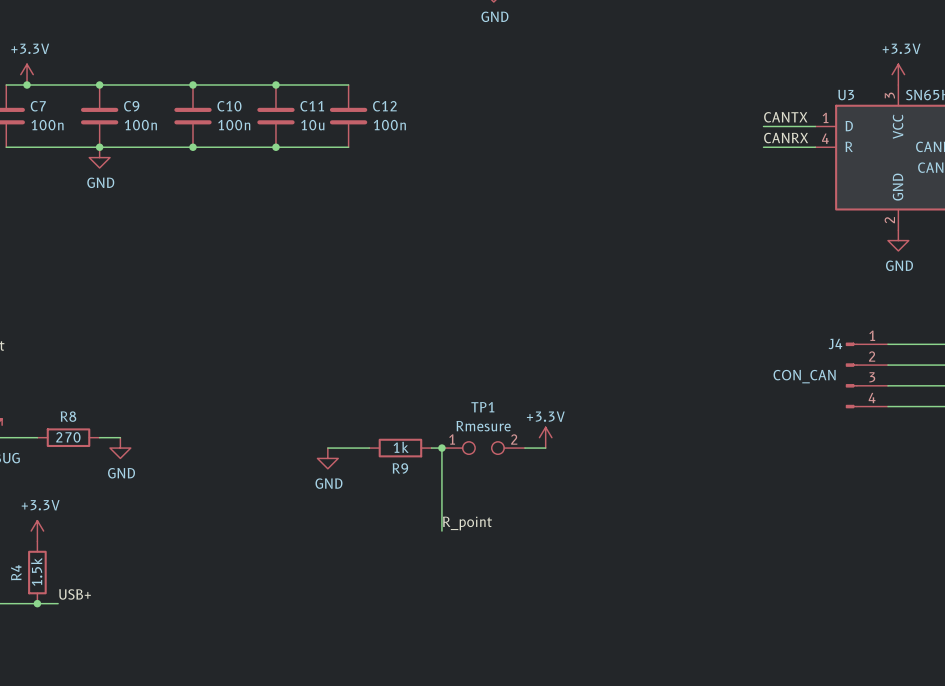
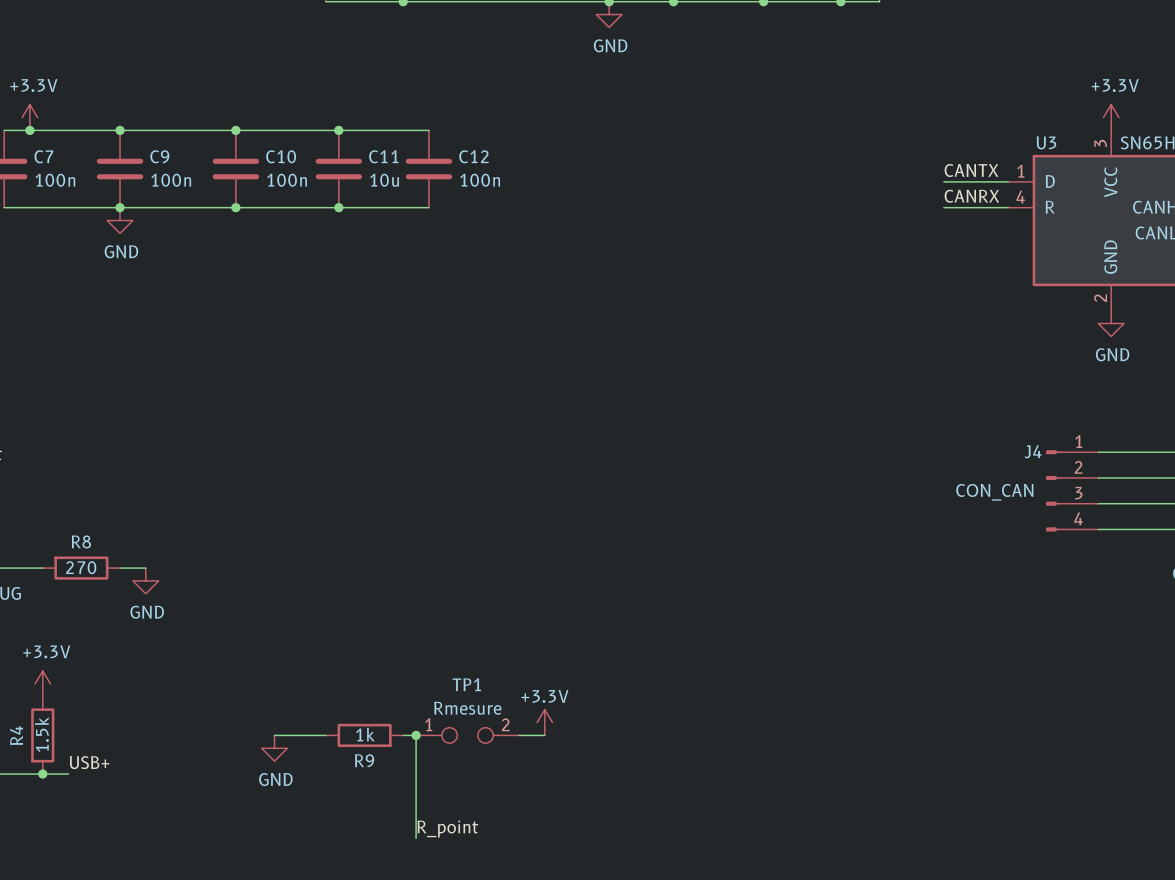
power symbol position: +3.3V (545, 437) -> +3.3V (544, 722)
wire: (327, 448) (369, 448) -> (274, 735) (325, 735)
R9 position: (400, 448) -> (364, 735)
wire: (431, 448) (441, 448) (441, 531) -> (403, 735) (416, 735) (416, 838)
junction: (441, 448) -> none
TP1 position: (483, 448) -> (467, 735)
wire: (524, 448) (545, 448) -> (519, 735) (544, 735)
power symbol position: GND (327, 458) -> GND (274, 748)
label position: R_point (467, 523) -> R_point (447, 829)
junction: none -> (416, 735)

